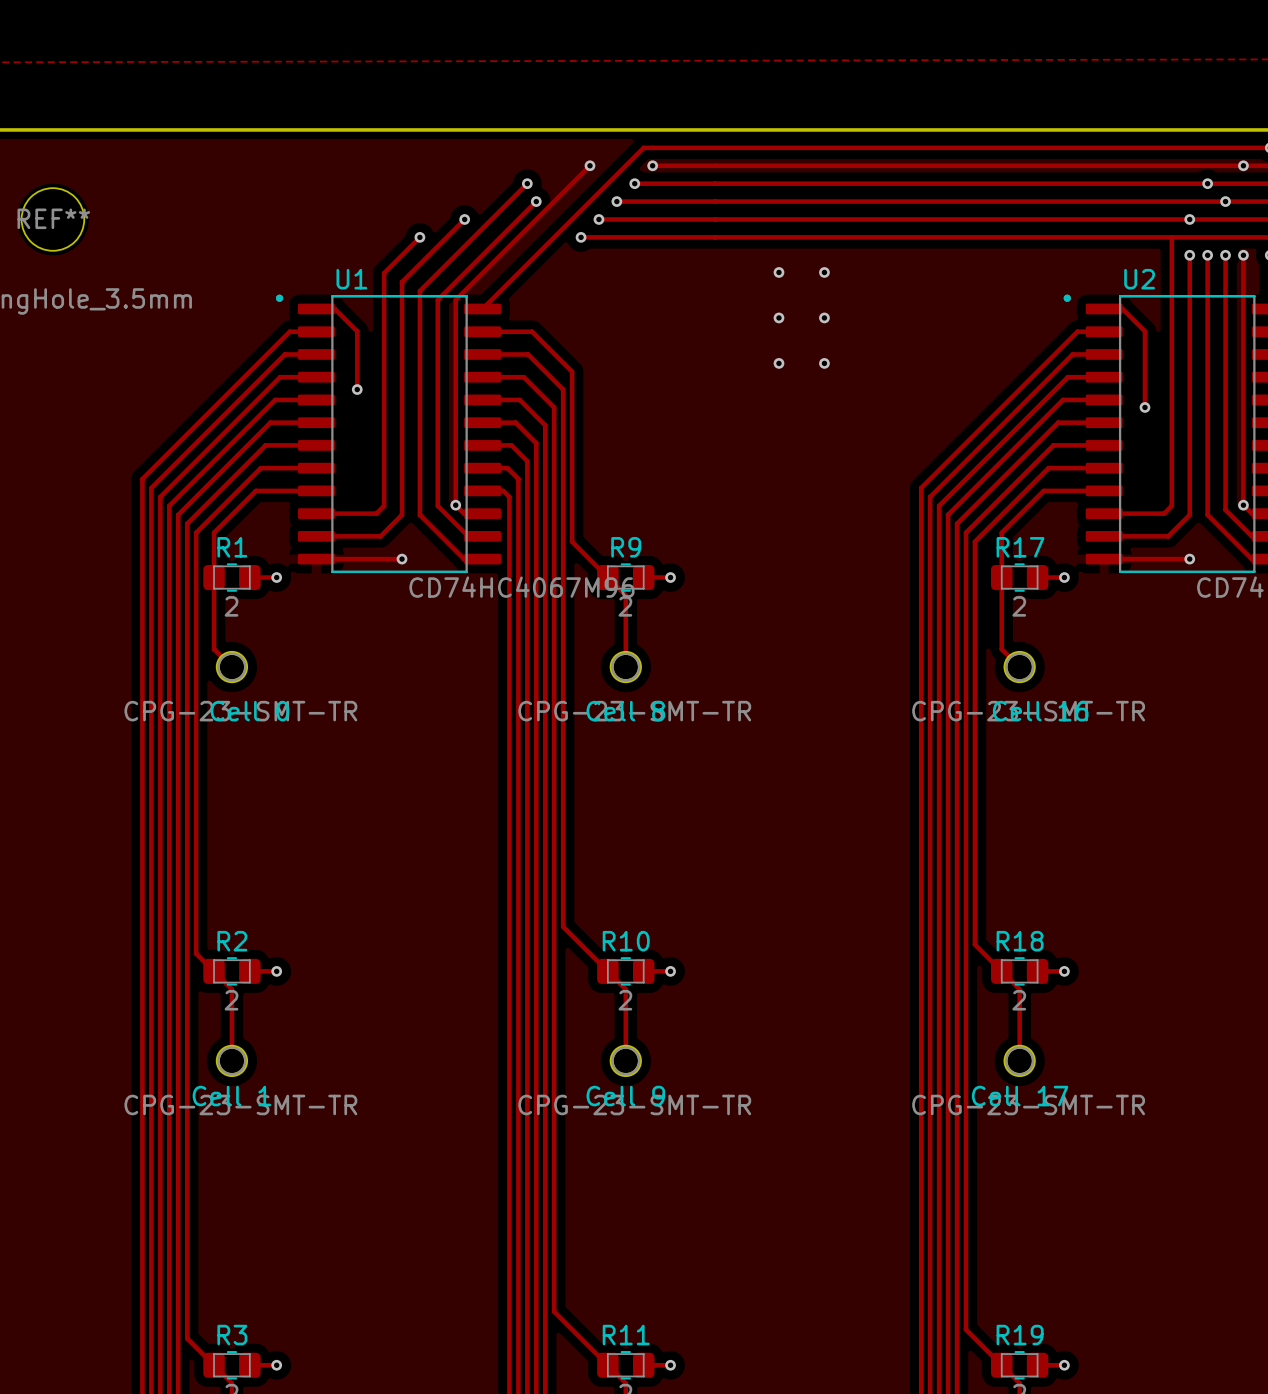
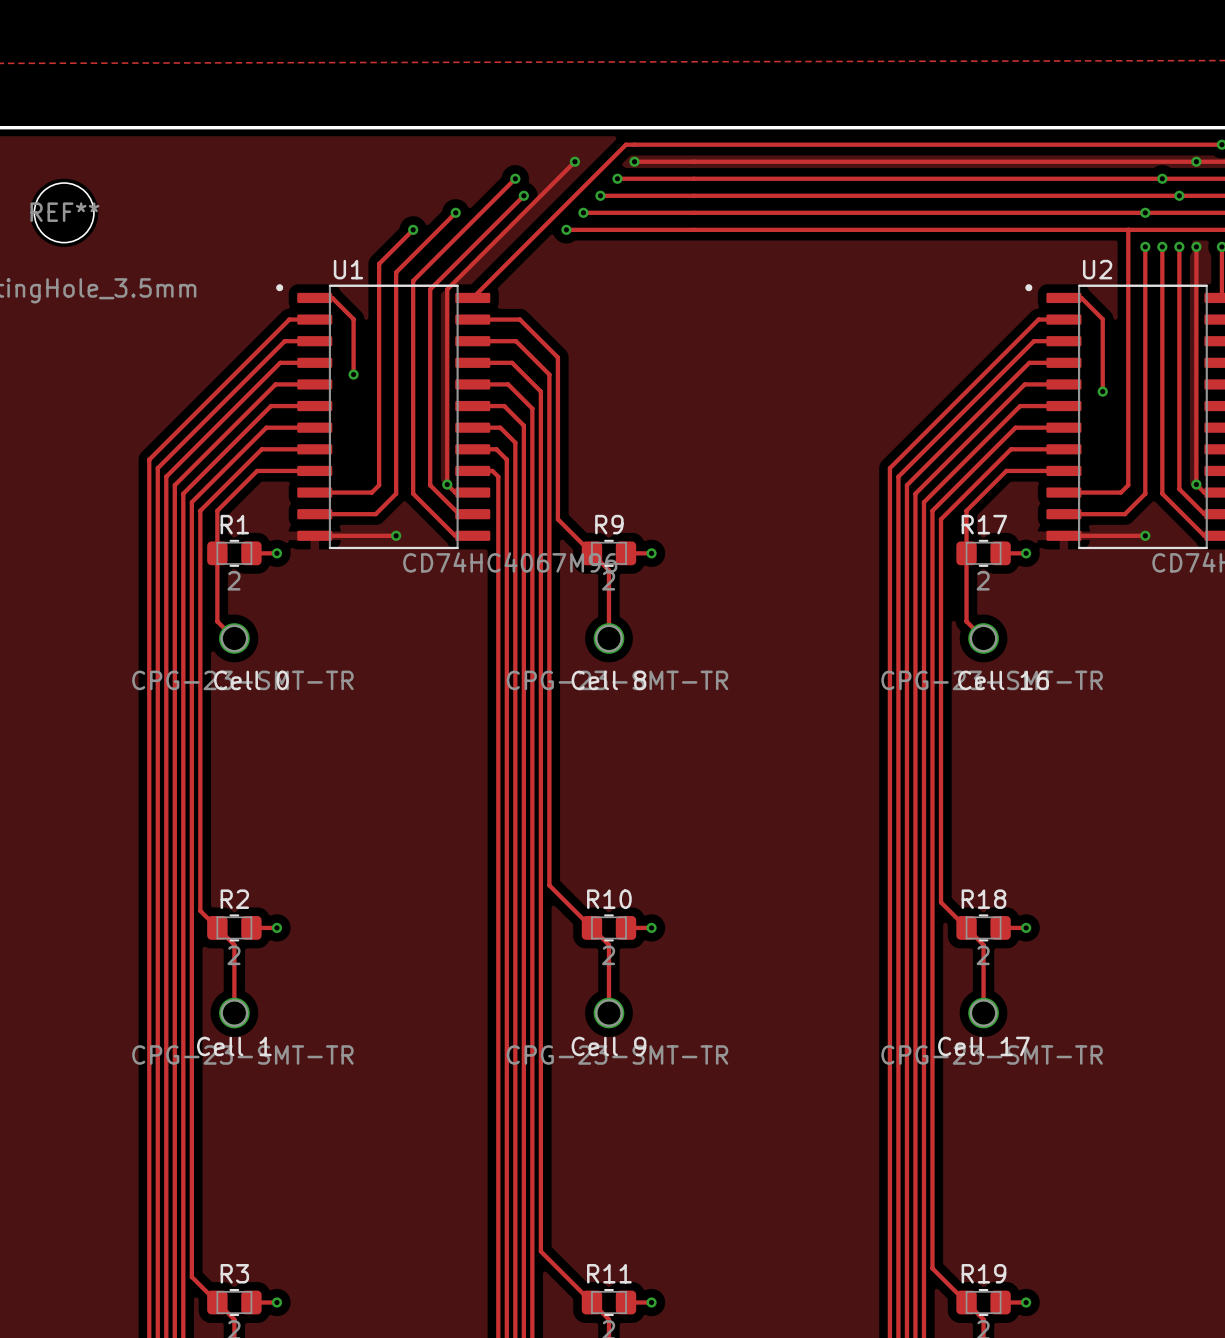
via: (778, 272) -> none
via: (824, 272) -> none
via: (778, 317) -> none
via: (824, 317) -> none
via: (778, 363) -> none
via: (824, 363) -> none

